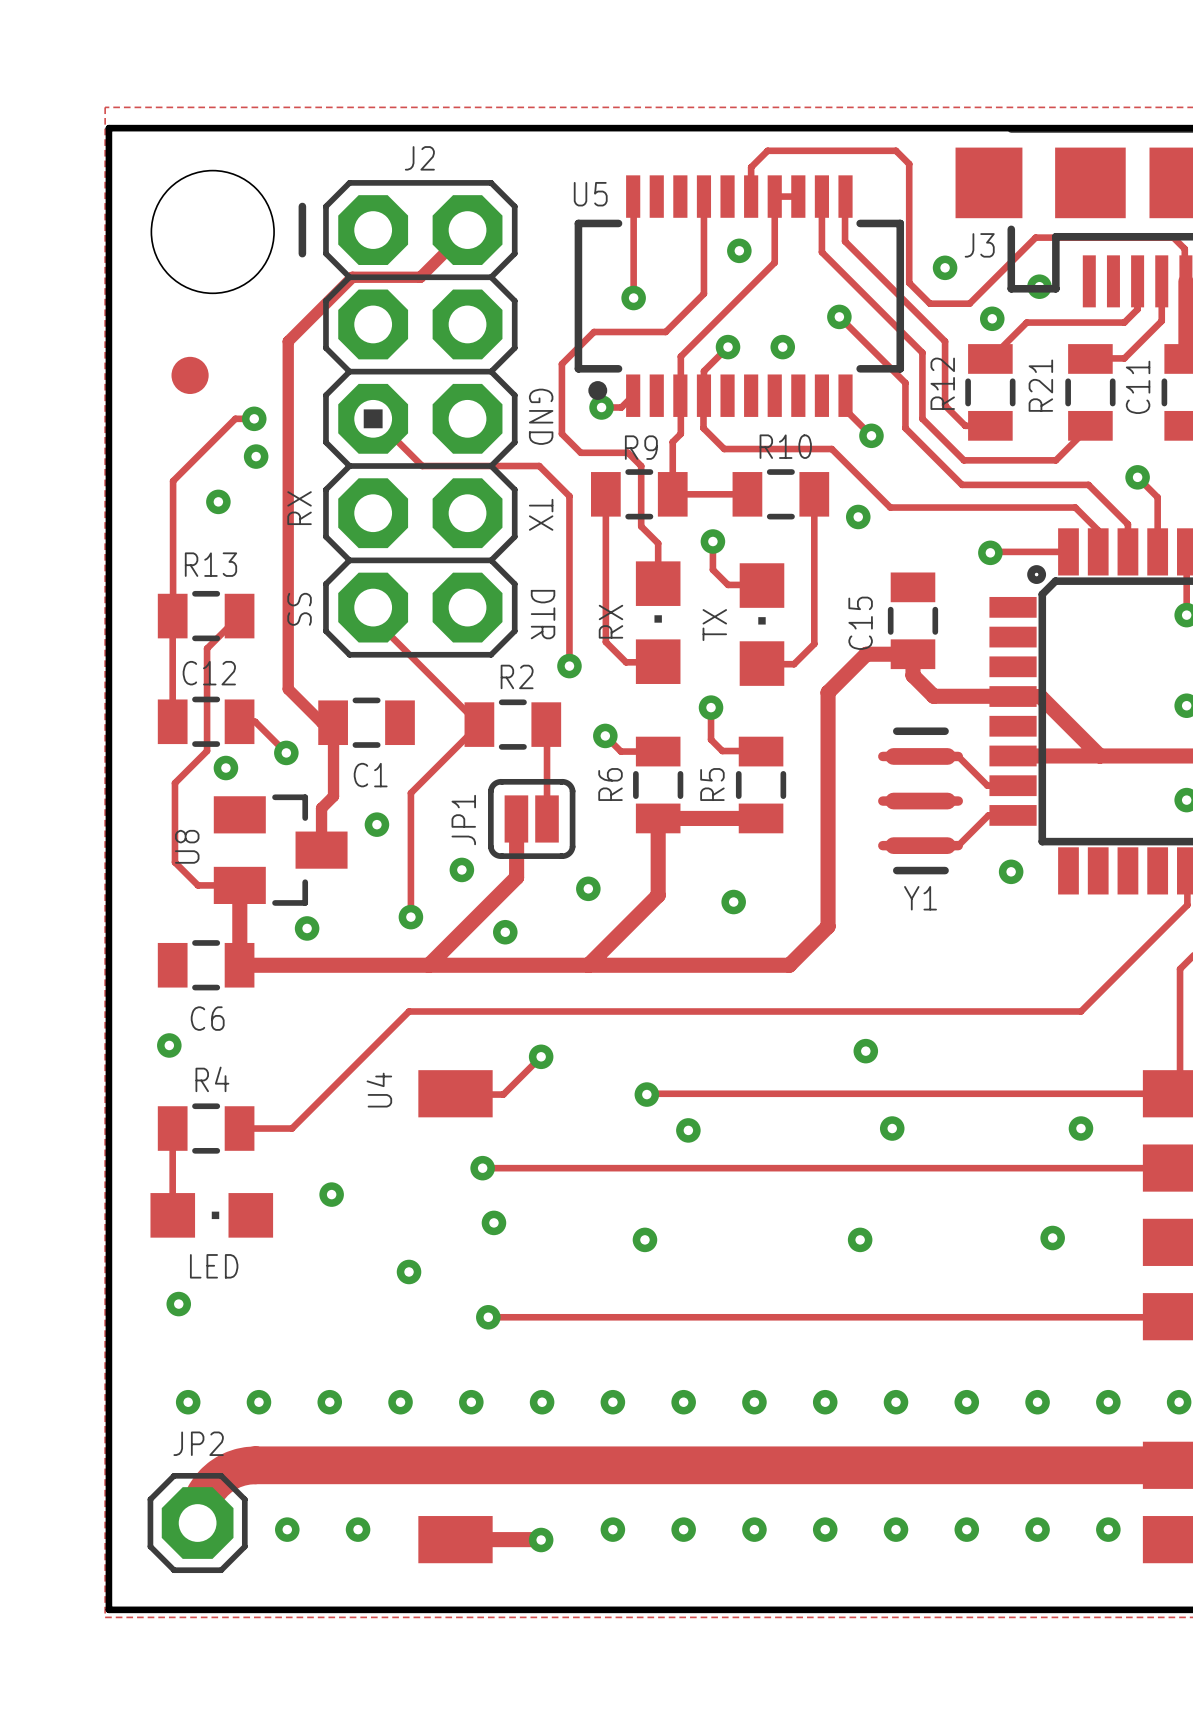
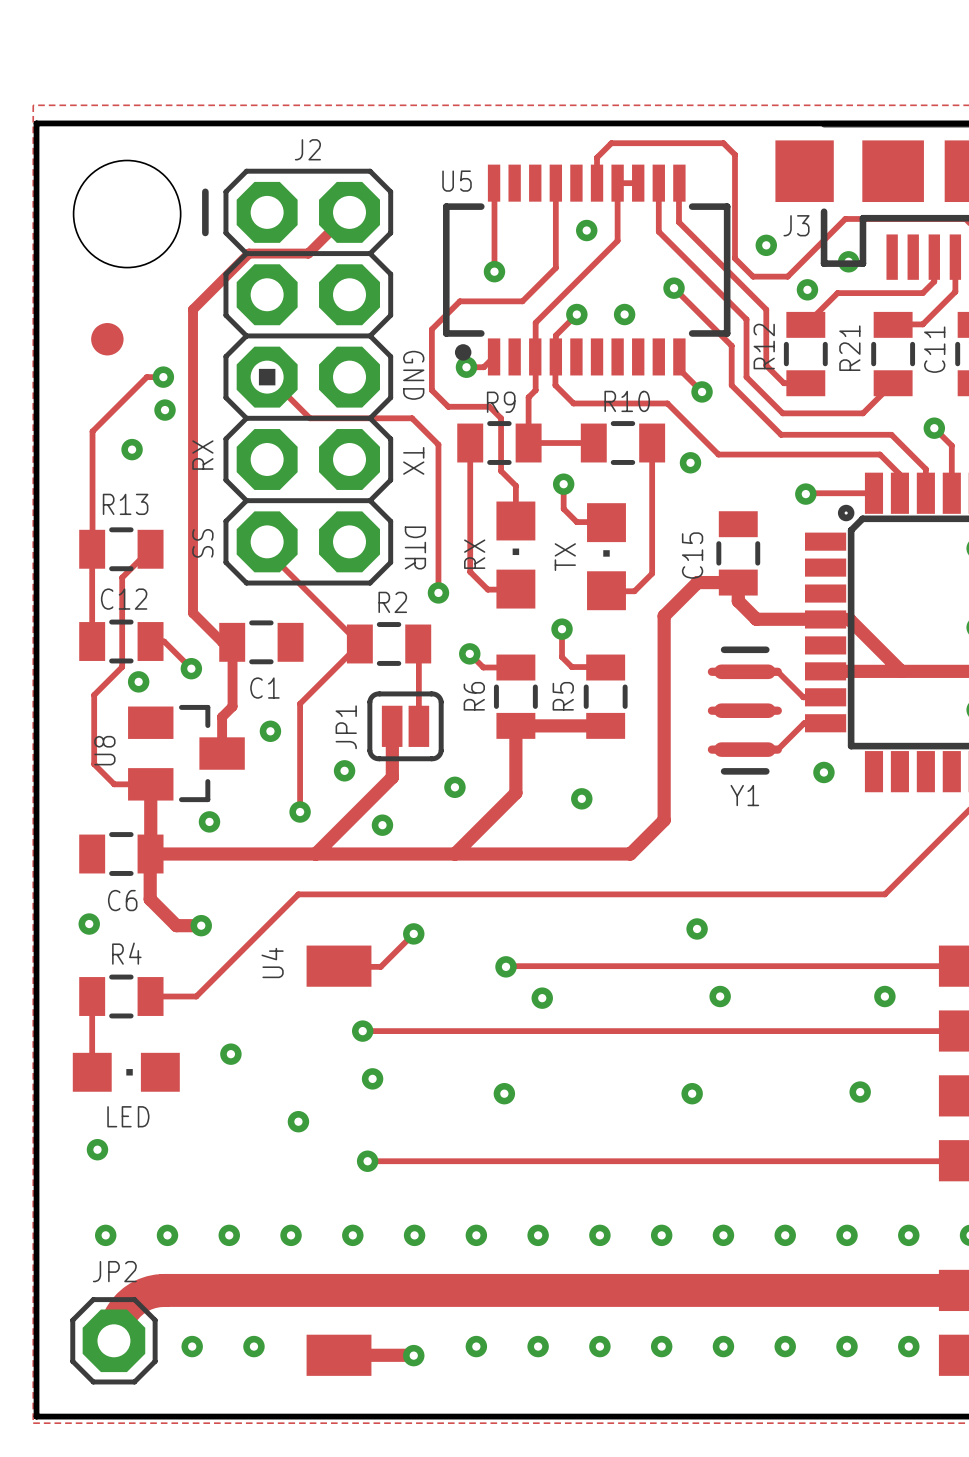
track: none -> (150, 854) (150, 899) (176, 925) (201, 925)
via: none -> (201, 925)

